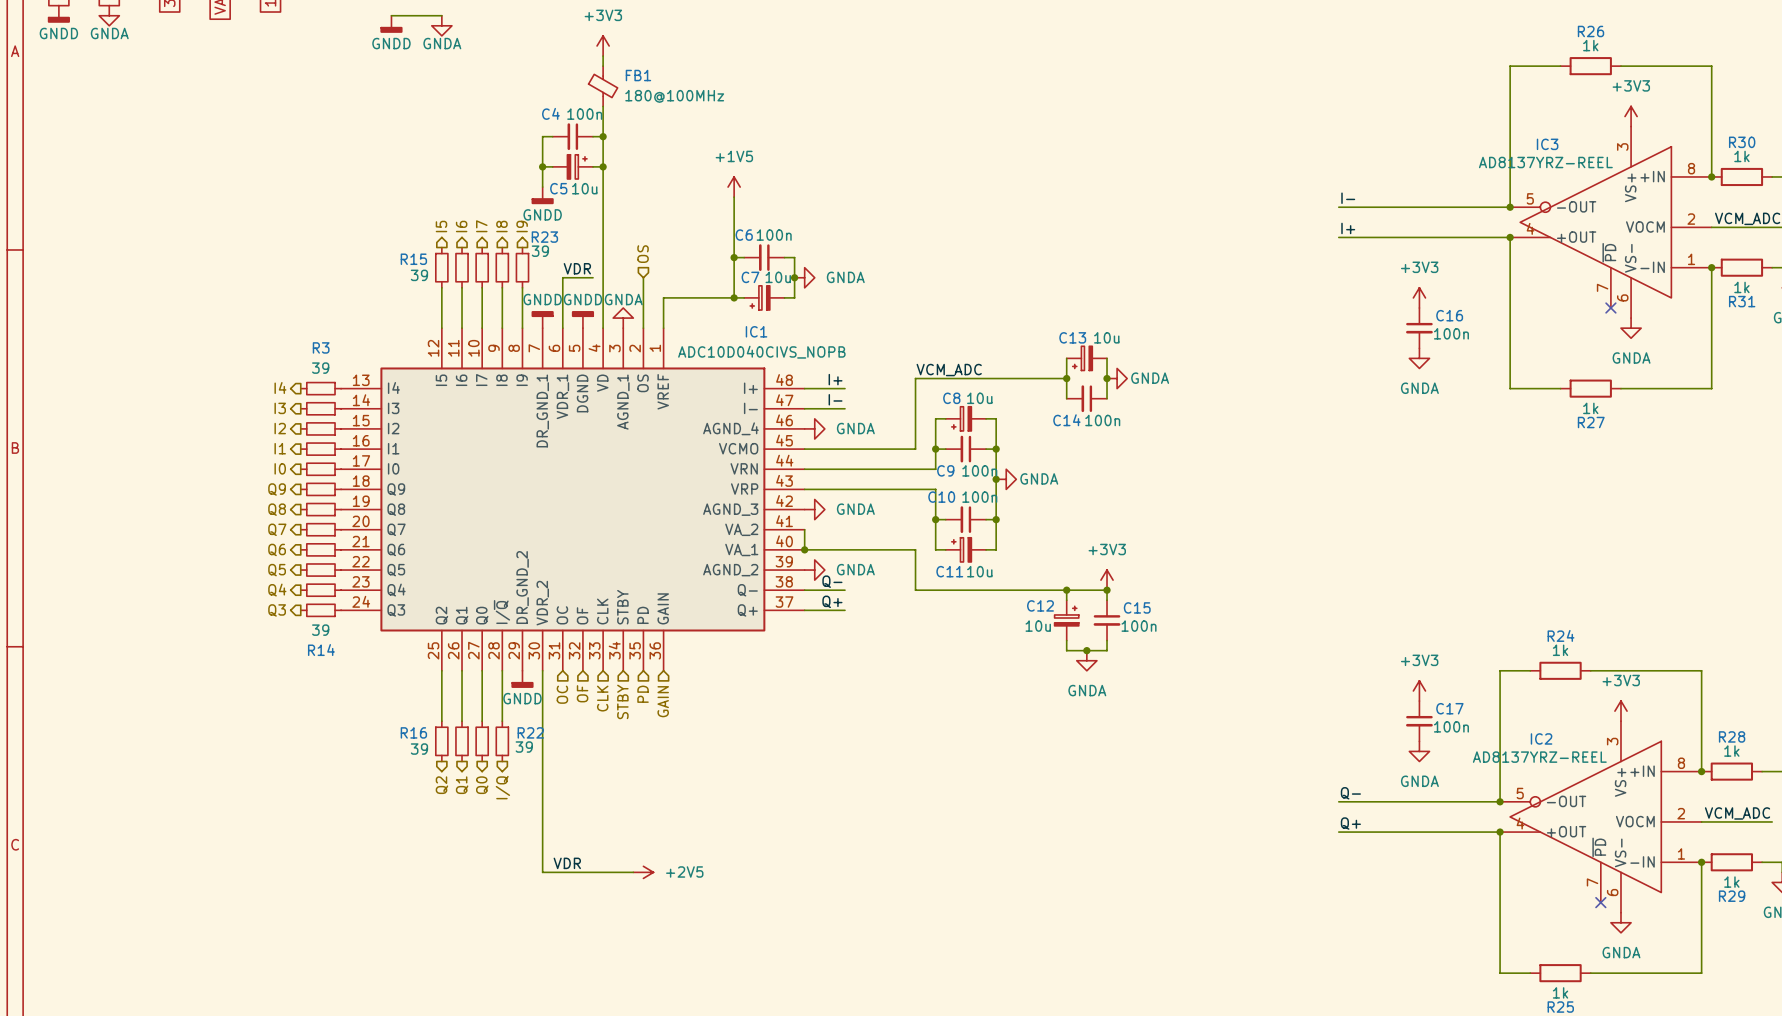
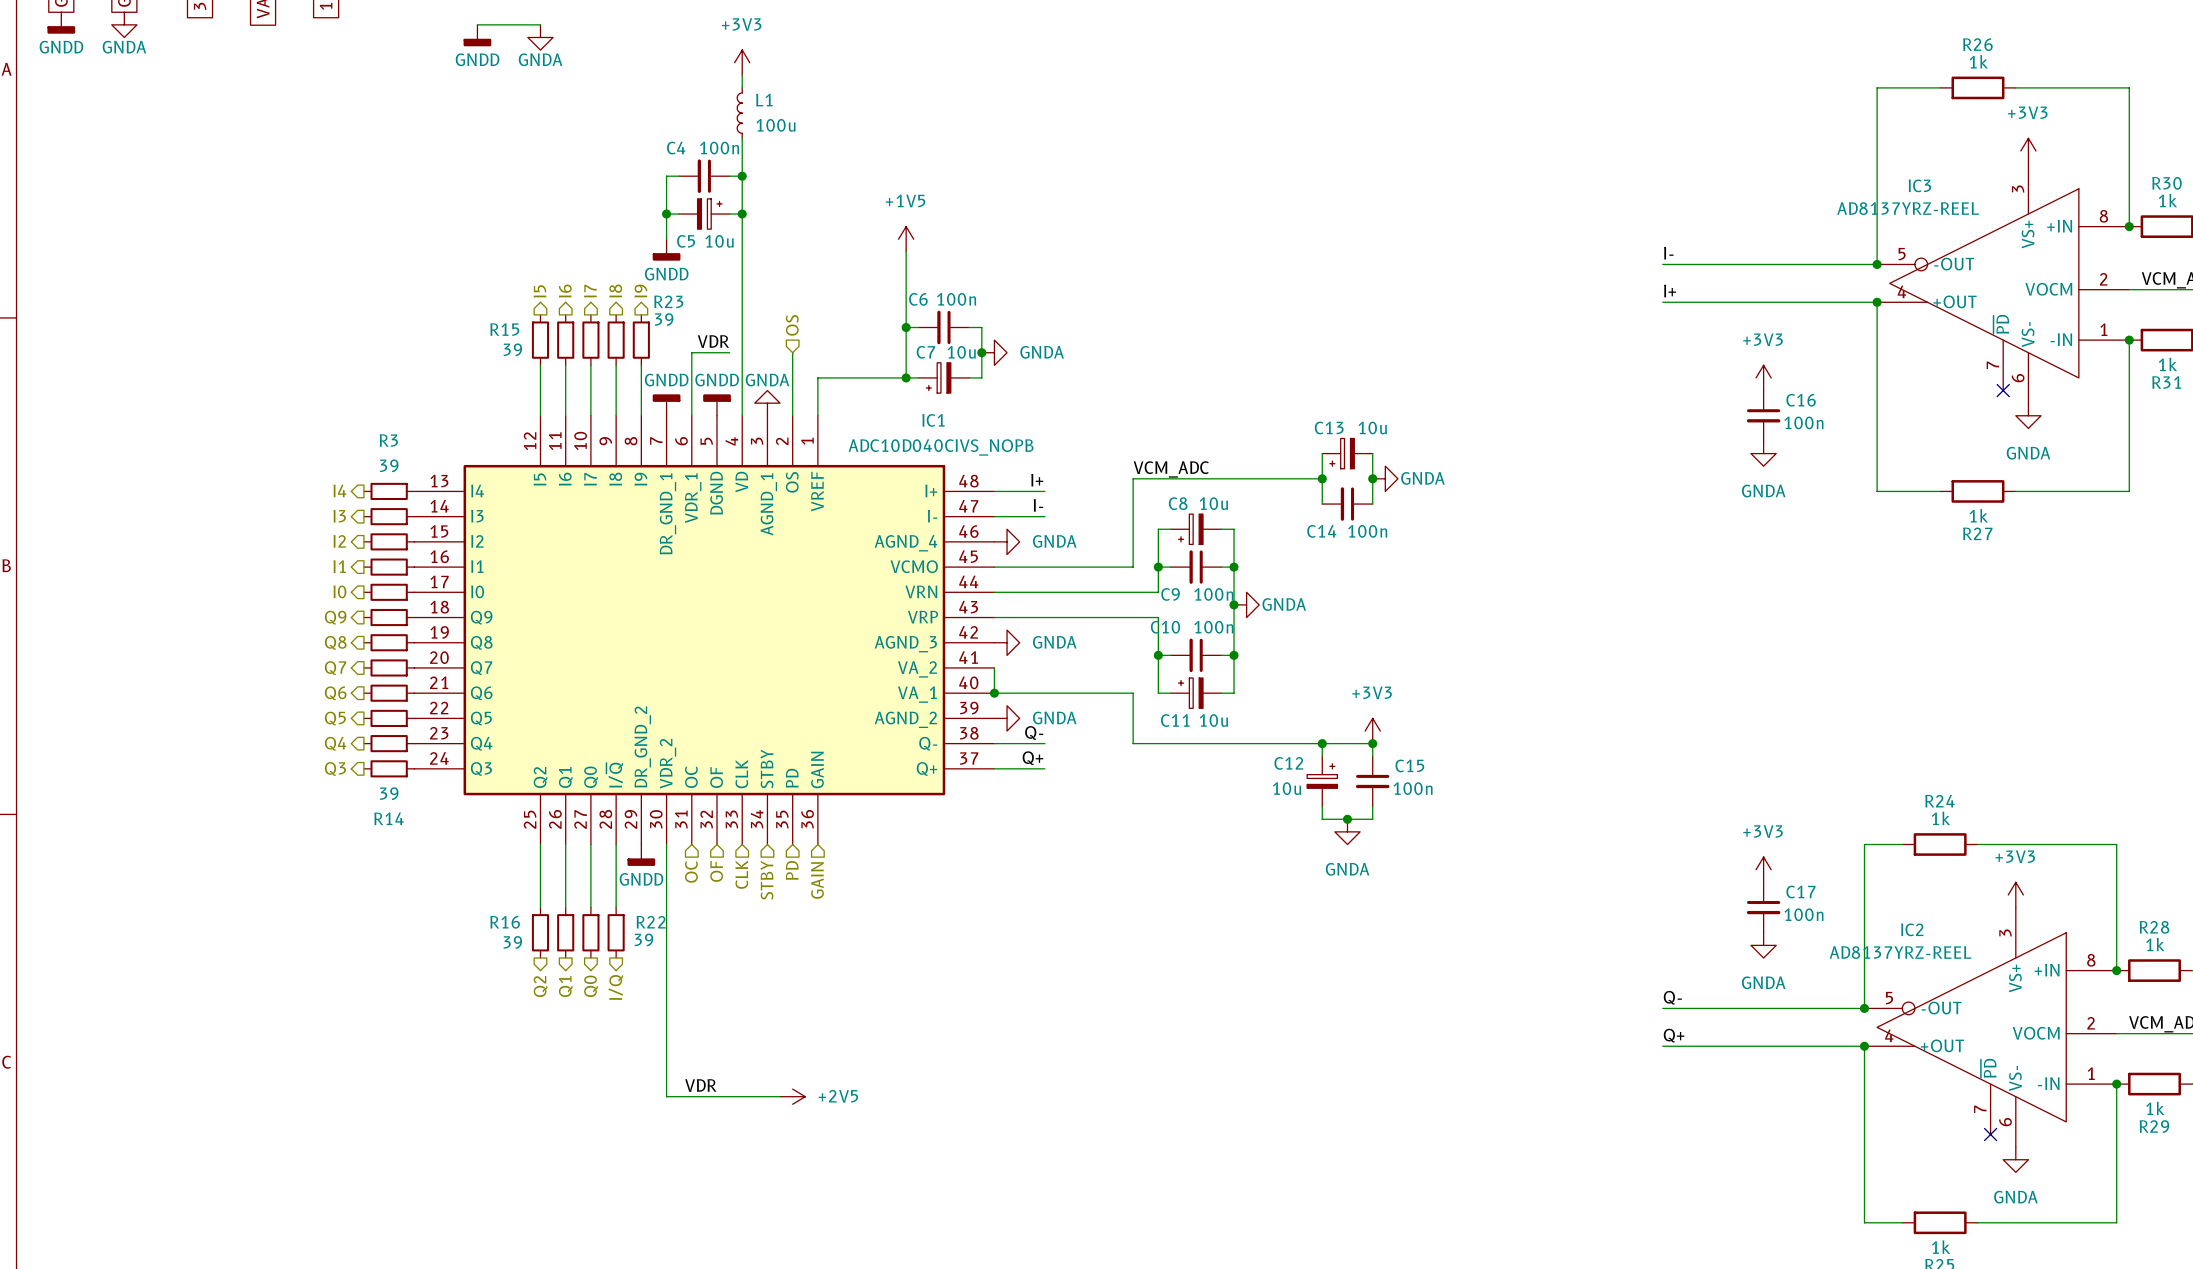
L1: none -> 100u (739, 113)
FB1: 180@100MHz (603, 86) -> none

